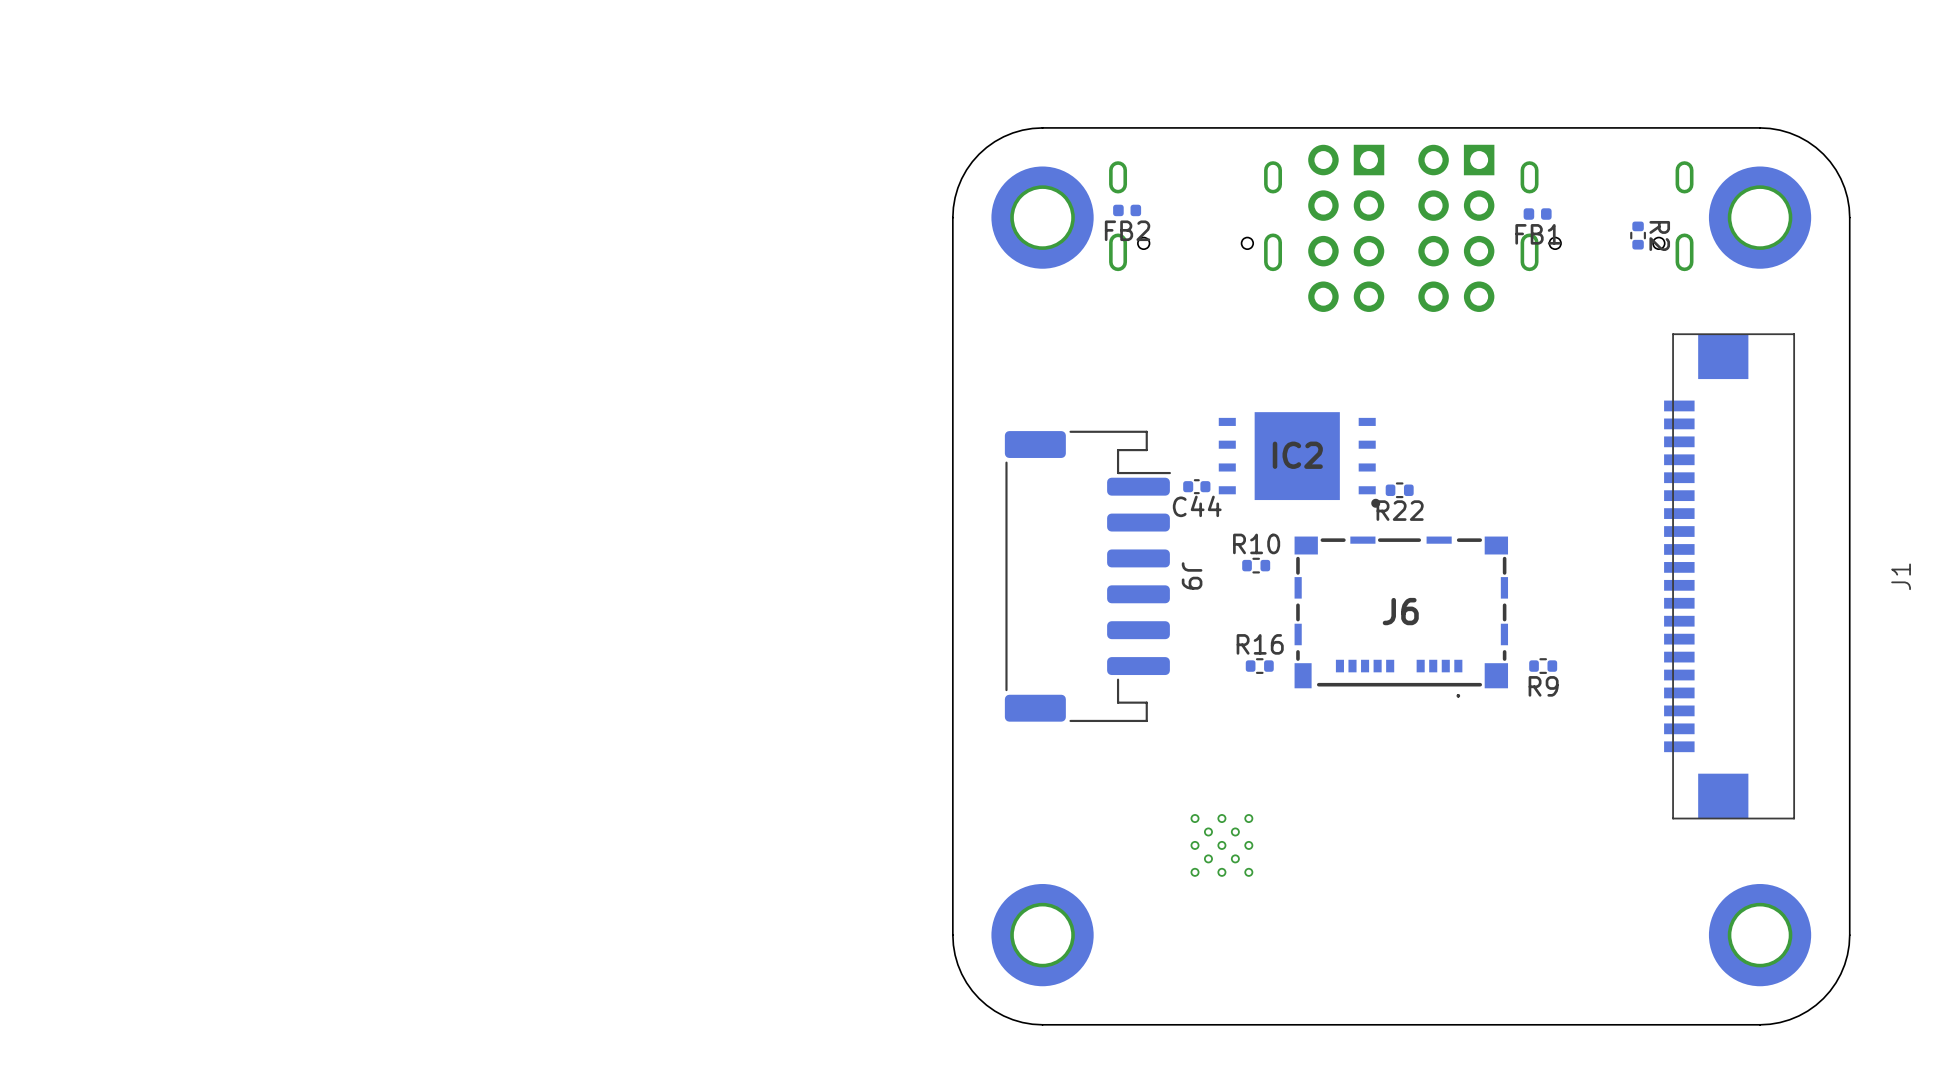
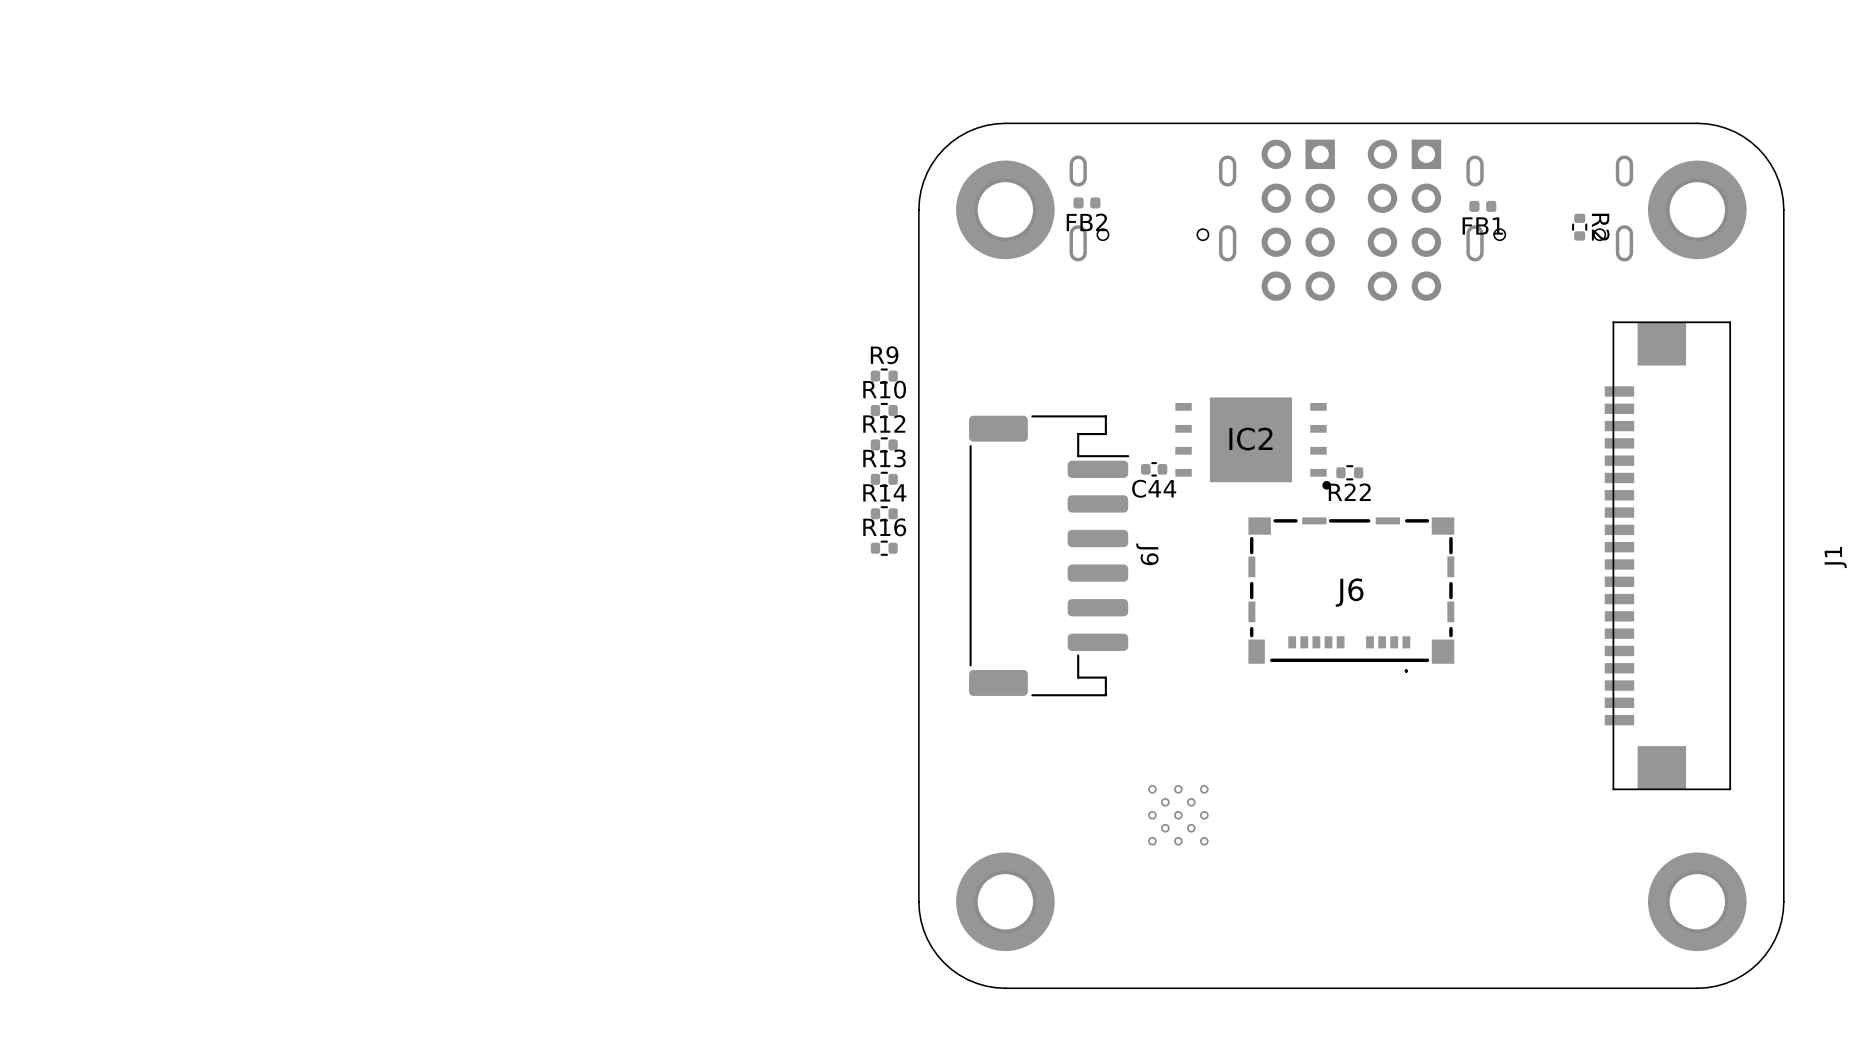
R12: none -> (884, 444)
R13: none -> (884, 479)
R14: none -> (884, 513)
R10 position: (1256, 565) -> (884, 410)
R16 position: (1259, 666) -> (884, 548)
R9 position: (1543, 666) -> (884, 376)
R9 name position: R9 (1543, 686) -> R9 (884, 355)

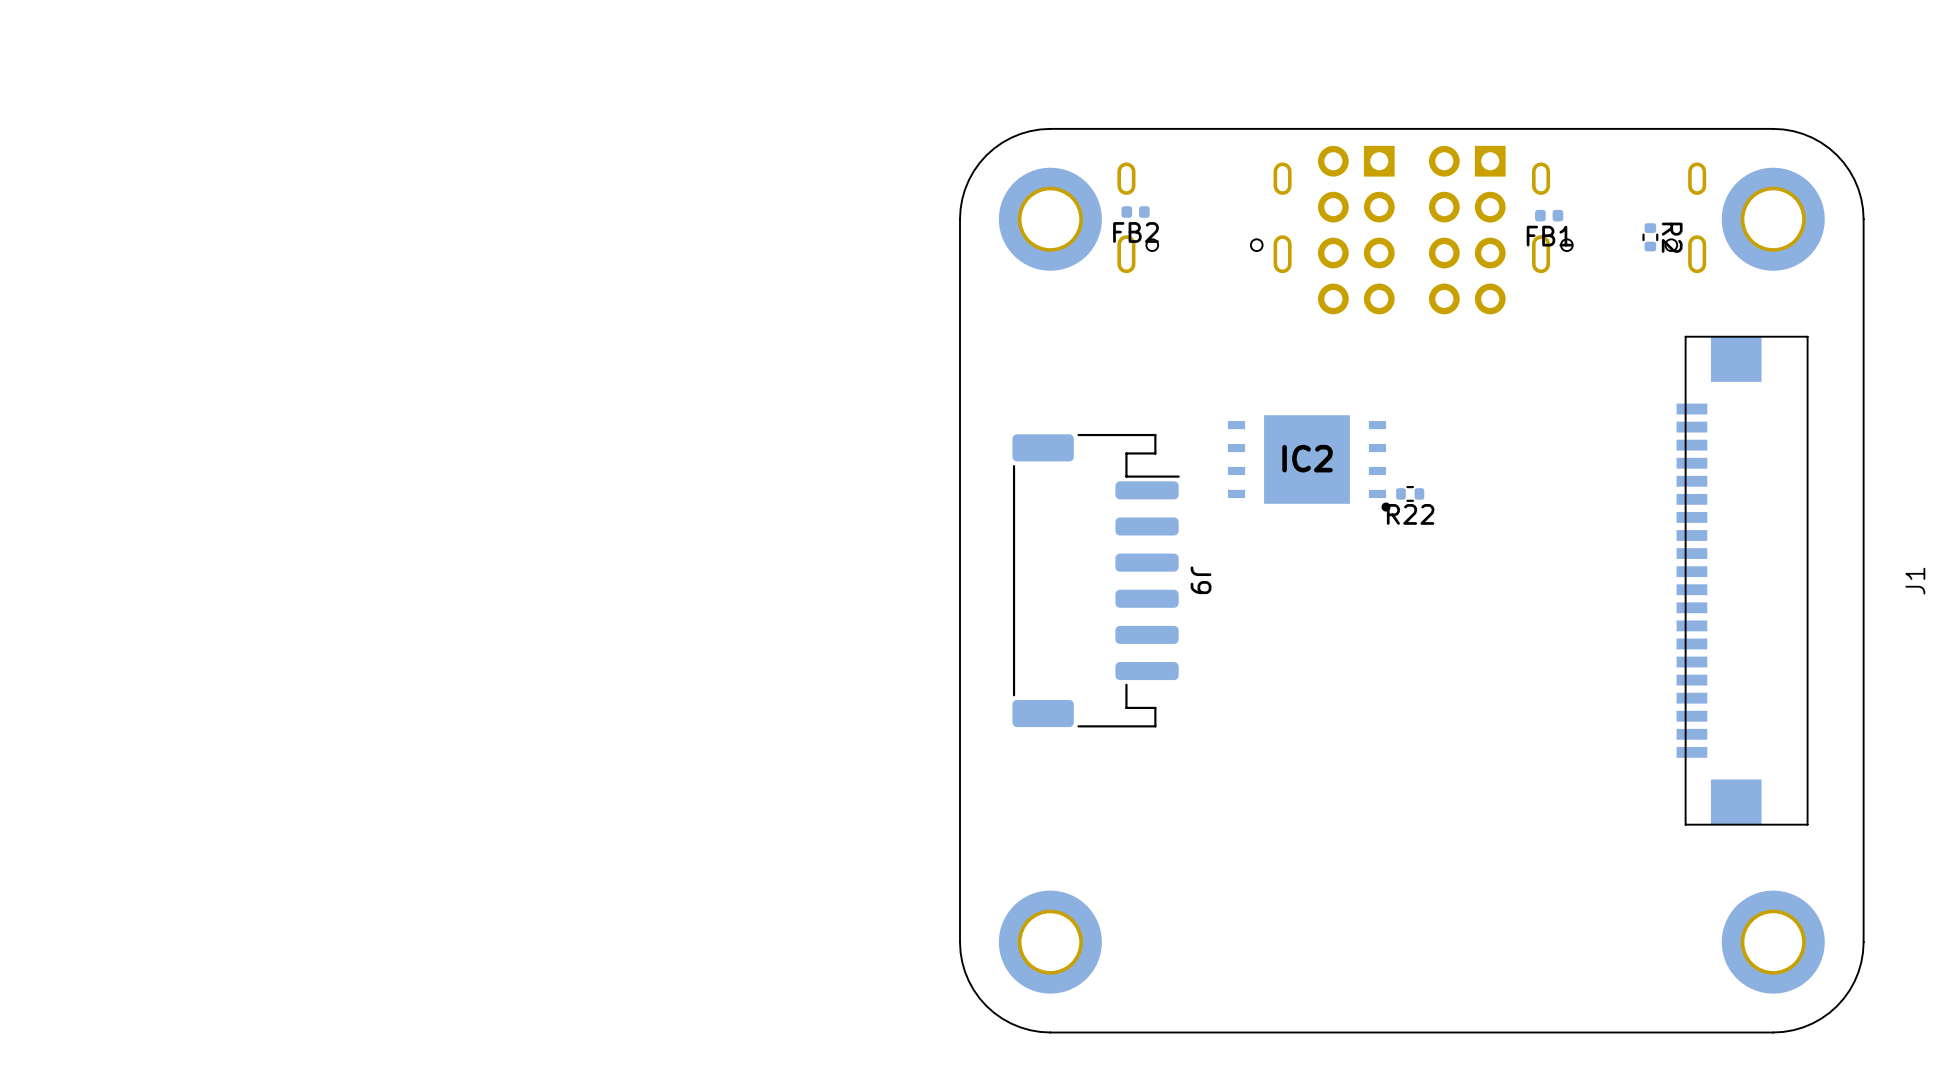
R9: (884, 376) -> none
R10: (884, 410) -> none
R12: (884, 444) -> none
C44: (1154, 469) -> none
R13: (884, 479) -> none
R14: (884, 513) -> none
R16: (884, 548) -> none
J6: (1351, 595) -> none
part: (1178, 815) -> none

